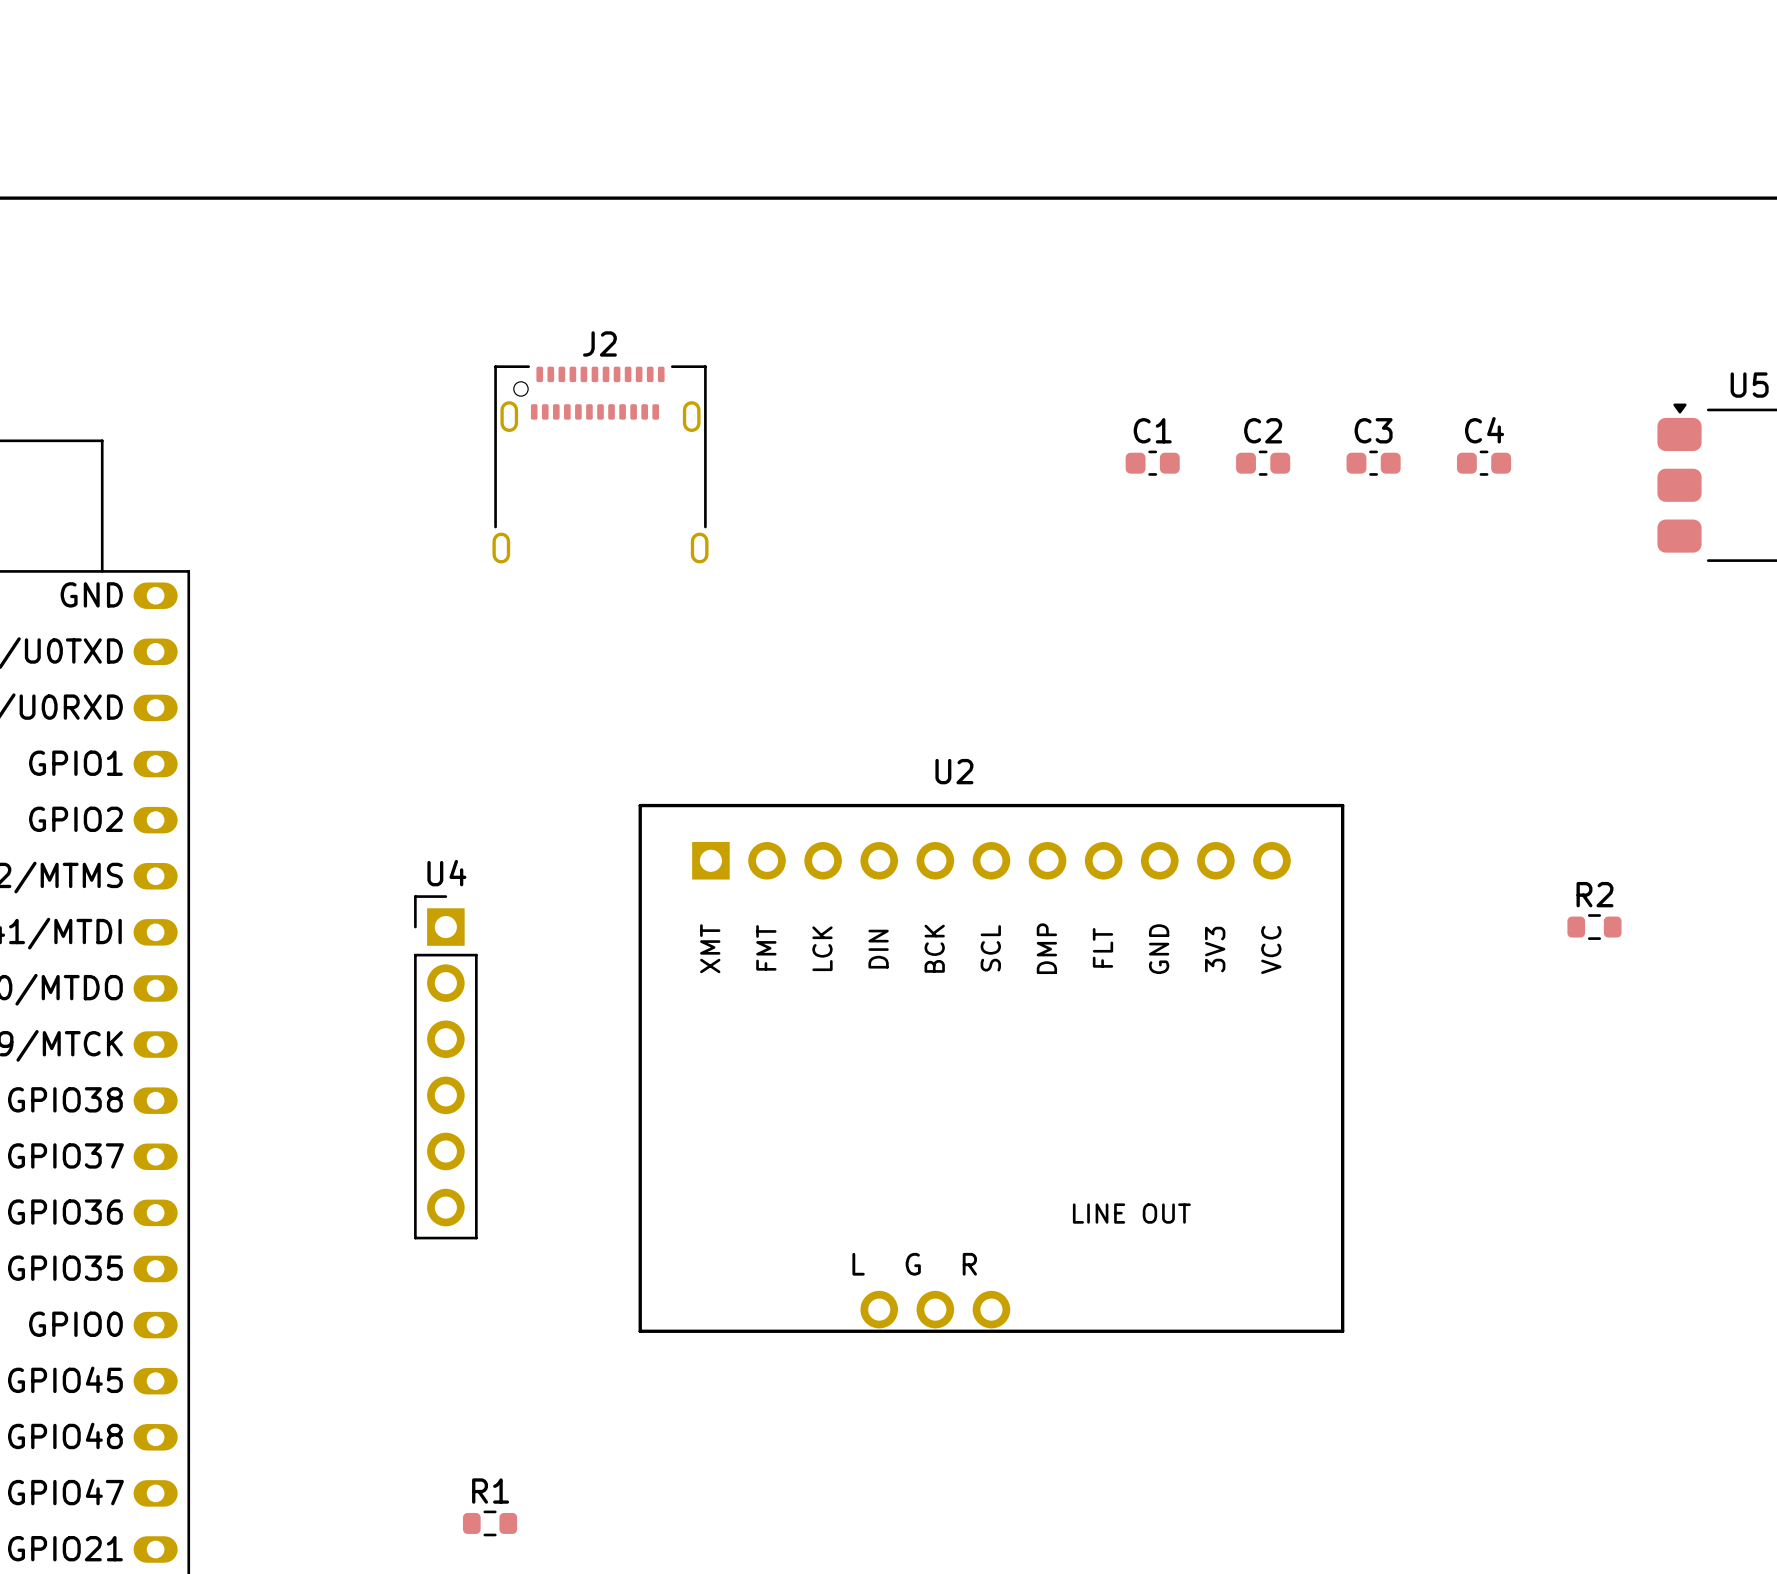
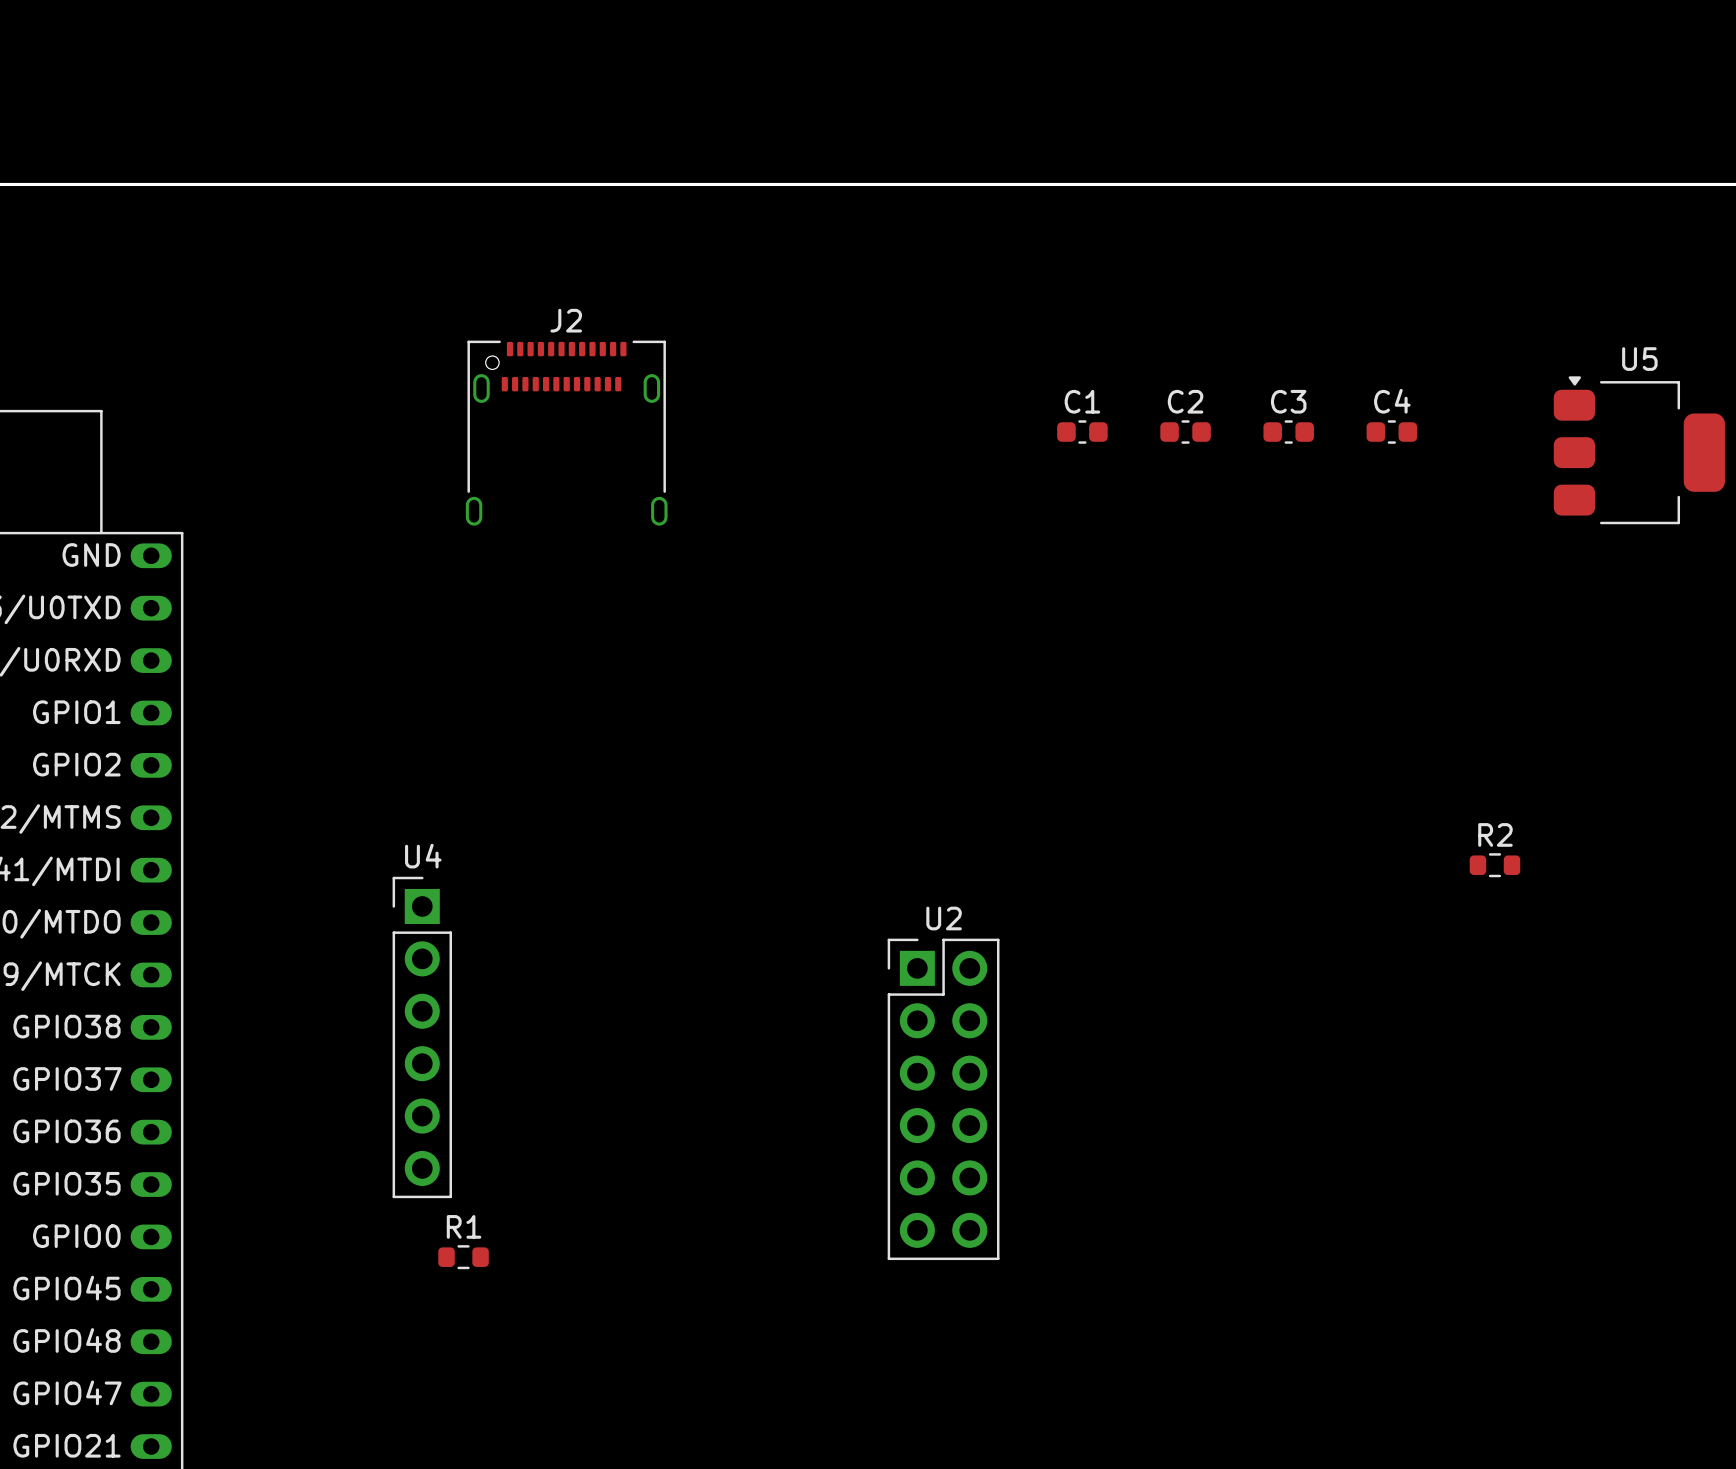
U2 name position: U2 (954, 771) -> U2 (944, 918)
U2 footprint: [638, 803, 1345, 1333] -> [887, 938, 1000, 1261]
U4 position: (445, 1067) -> (422, 1037)
R1 position: (490, 1523) -> (463, 1257)

